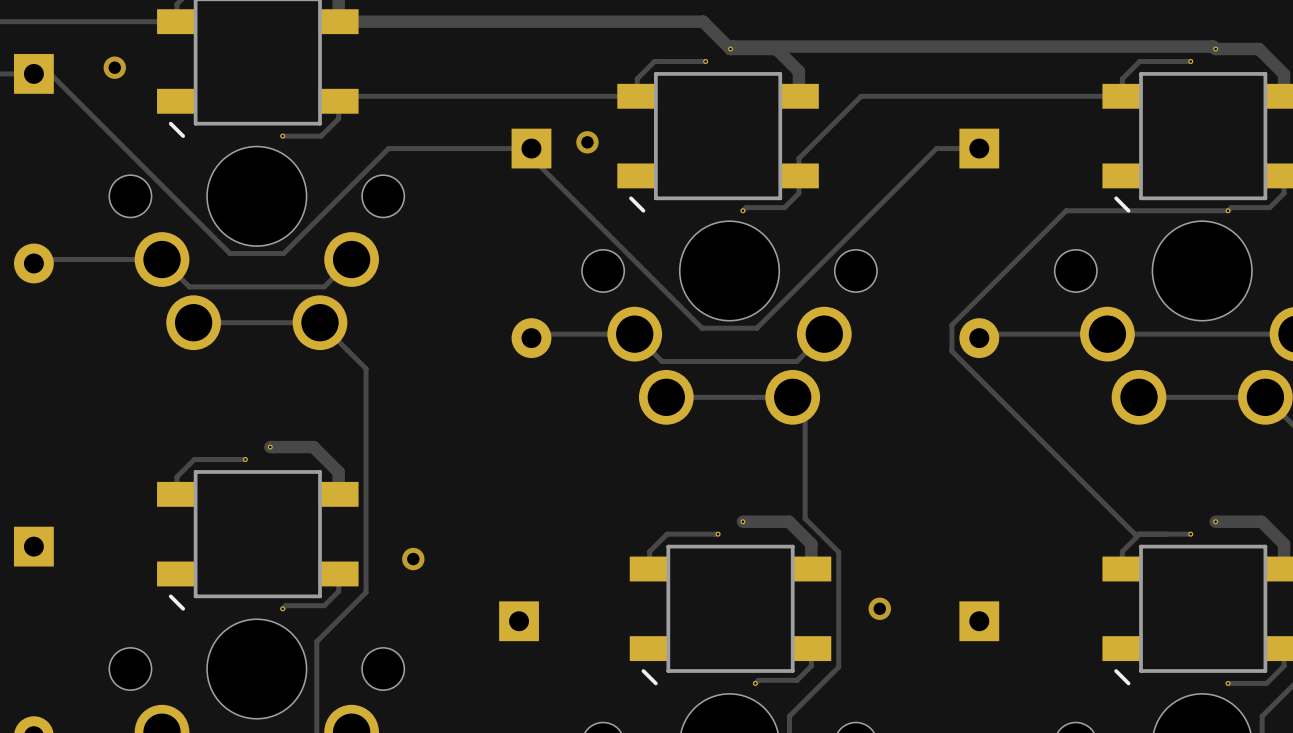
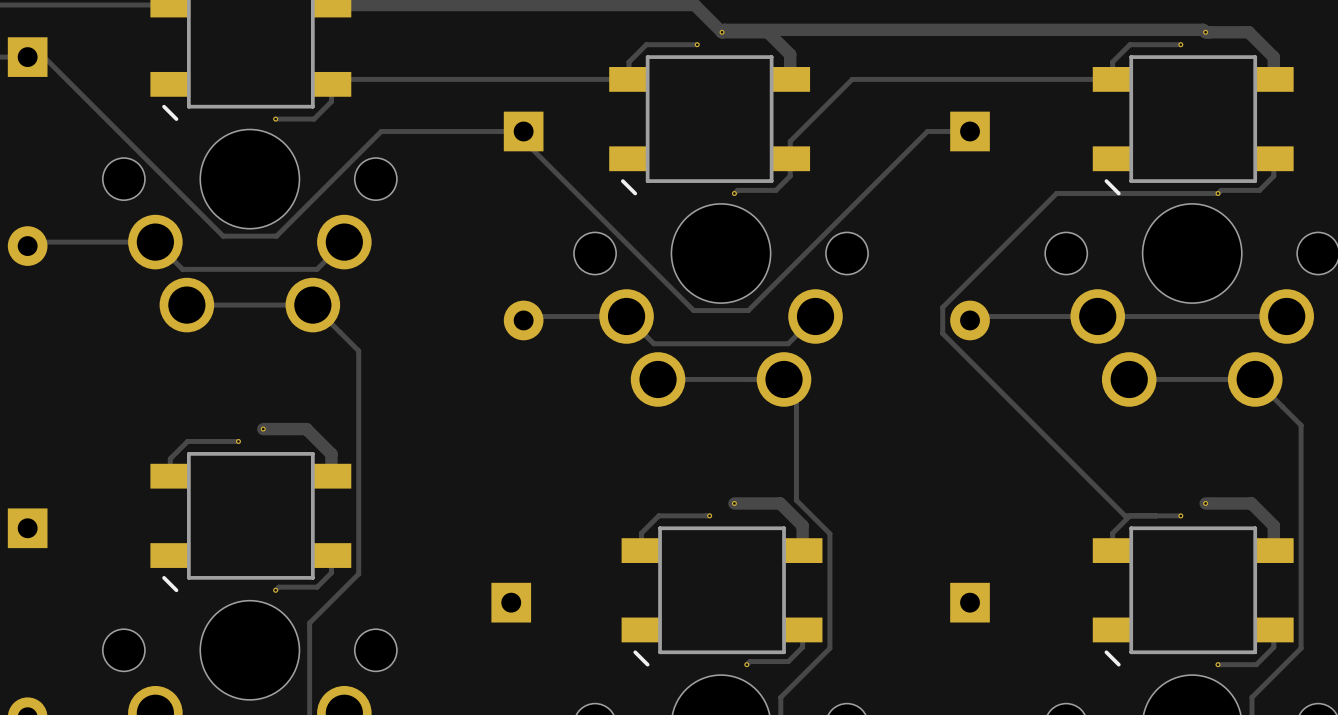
via: (114, 67) -> none
via: (587, 142) -> none
via: (413, 559) -> none
via: (879, 608) -> none

